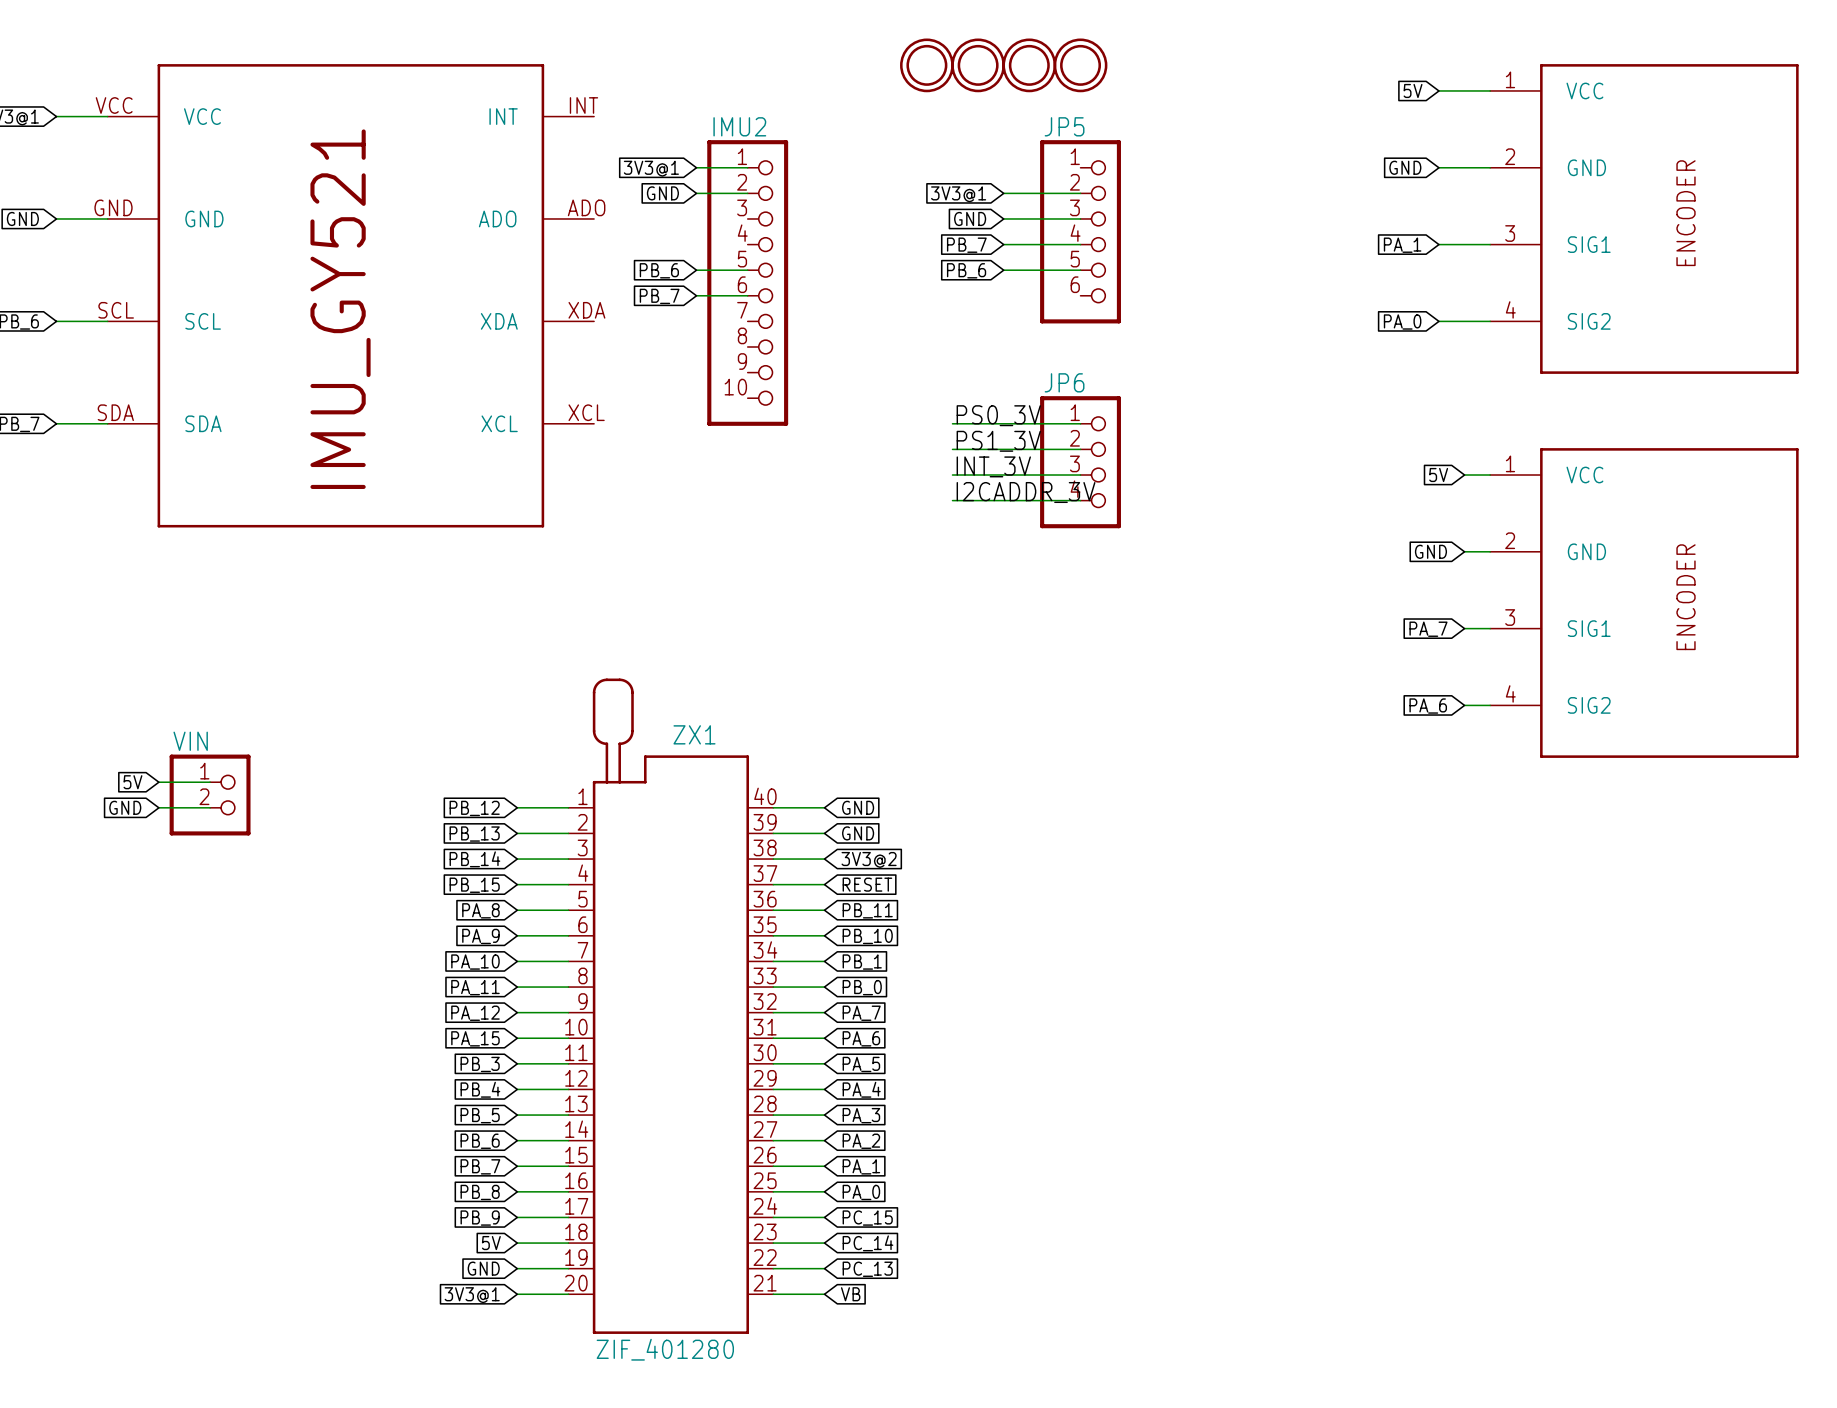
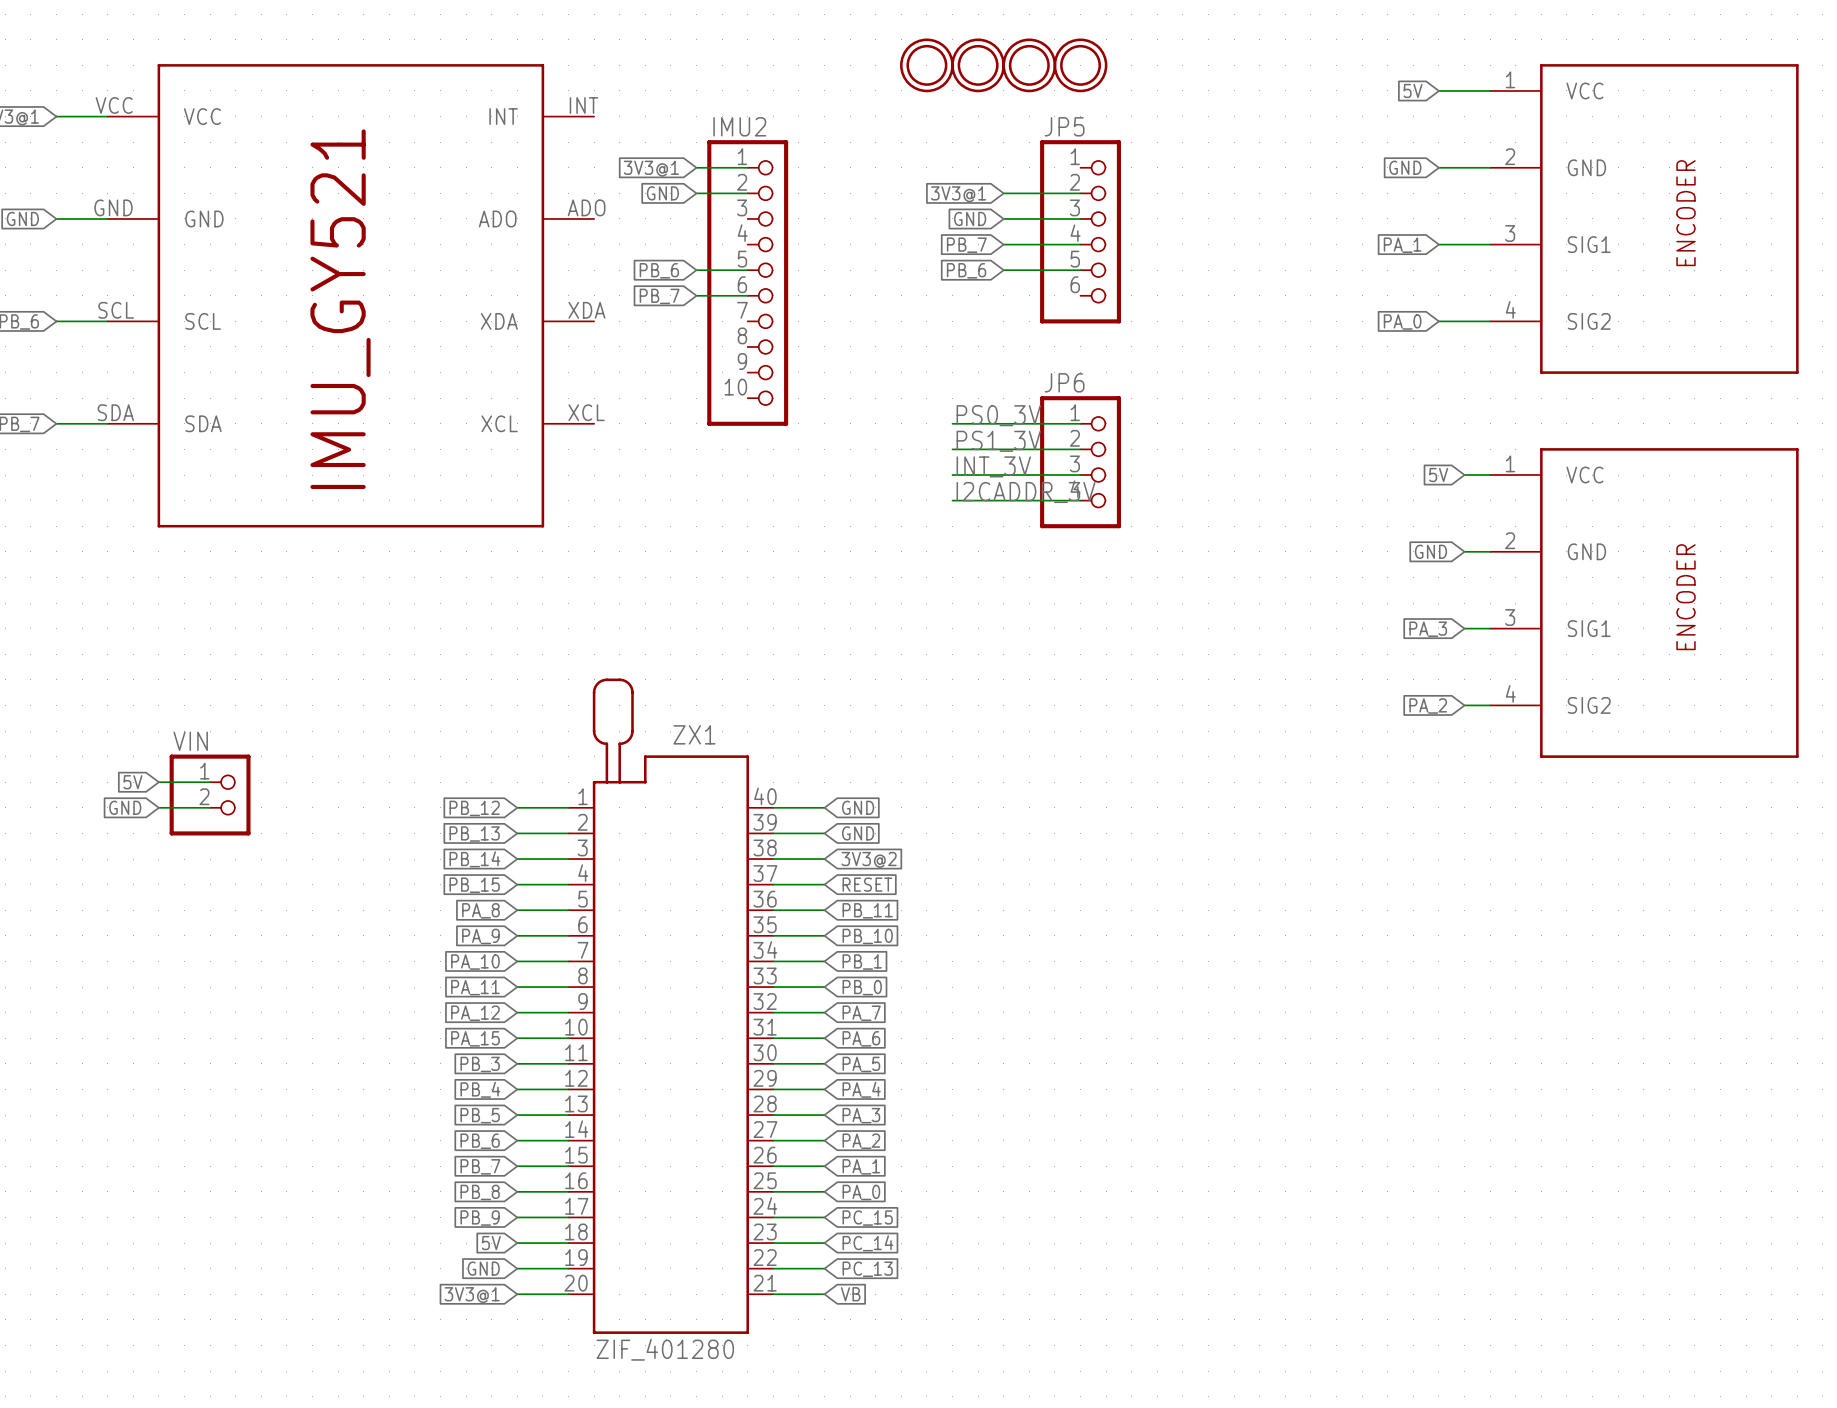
global label: PA_7 (1428, 629) -> PA_3 (1428, 629)
global label: PA_6 (1428, 706) -> PA_2 (1428, 706)

